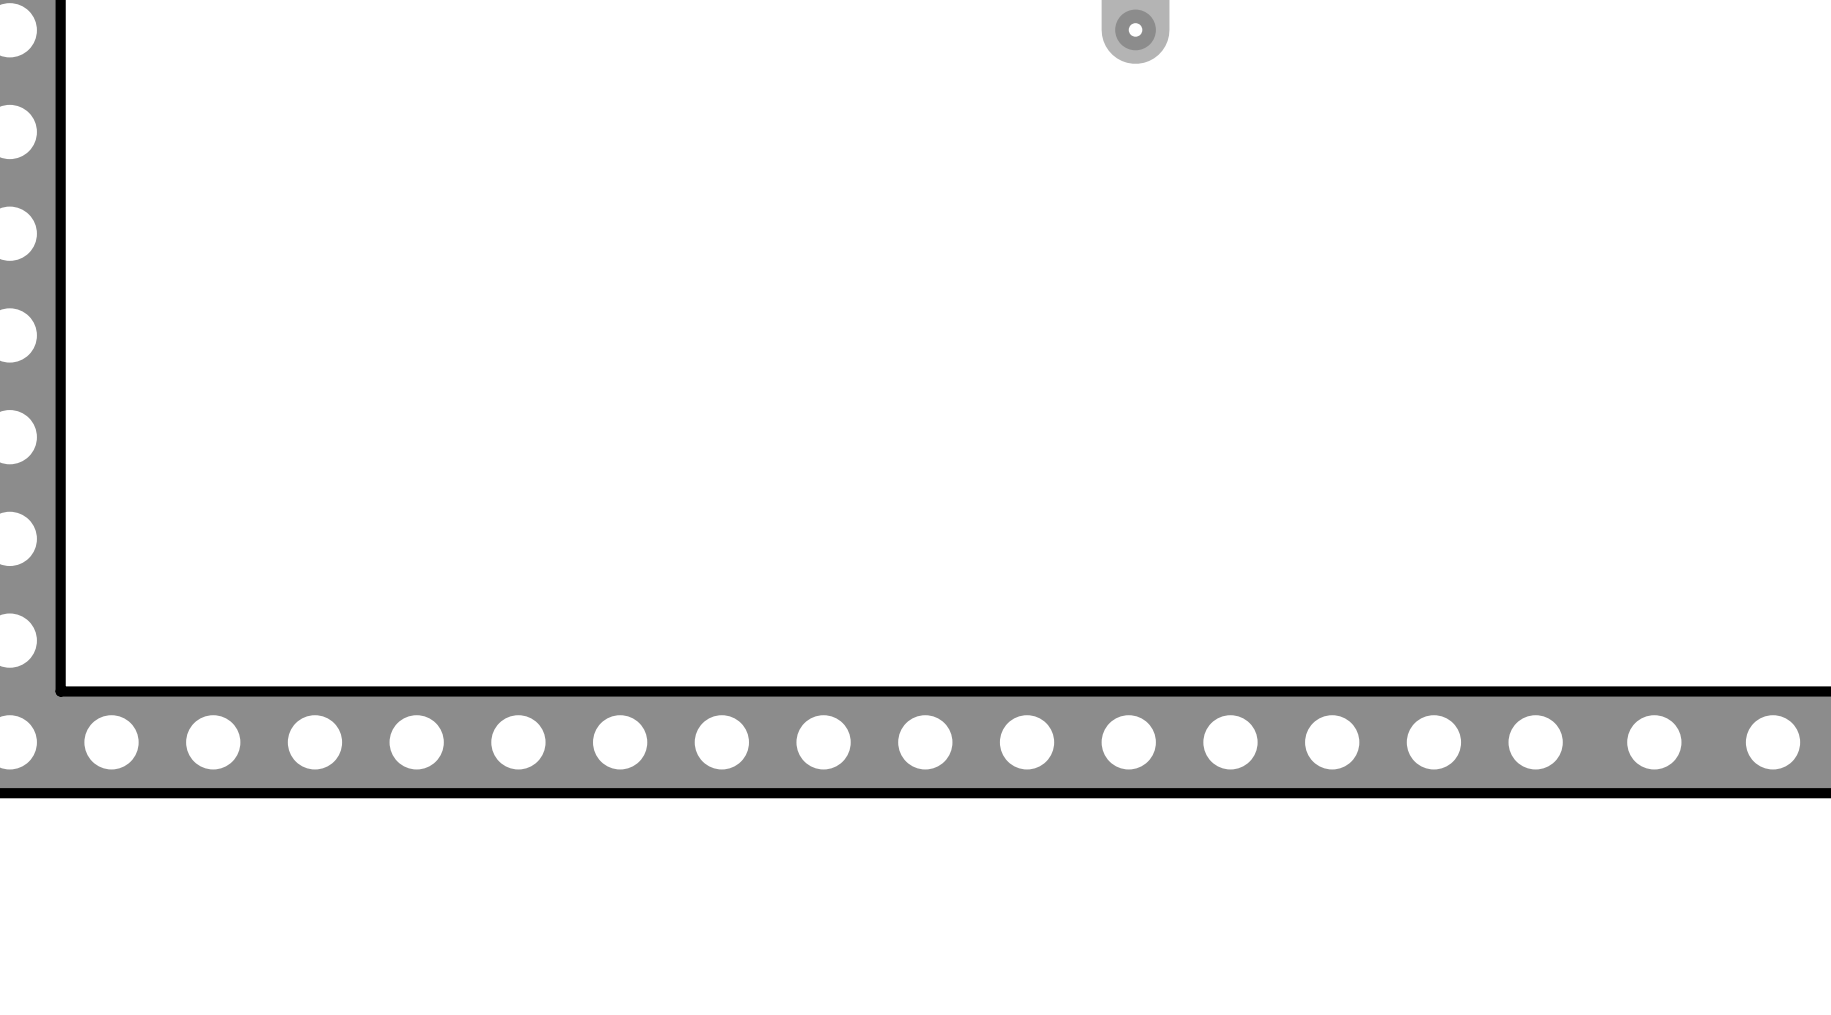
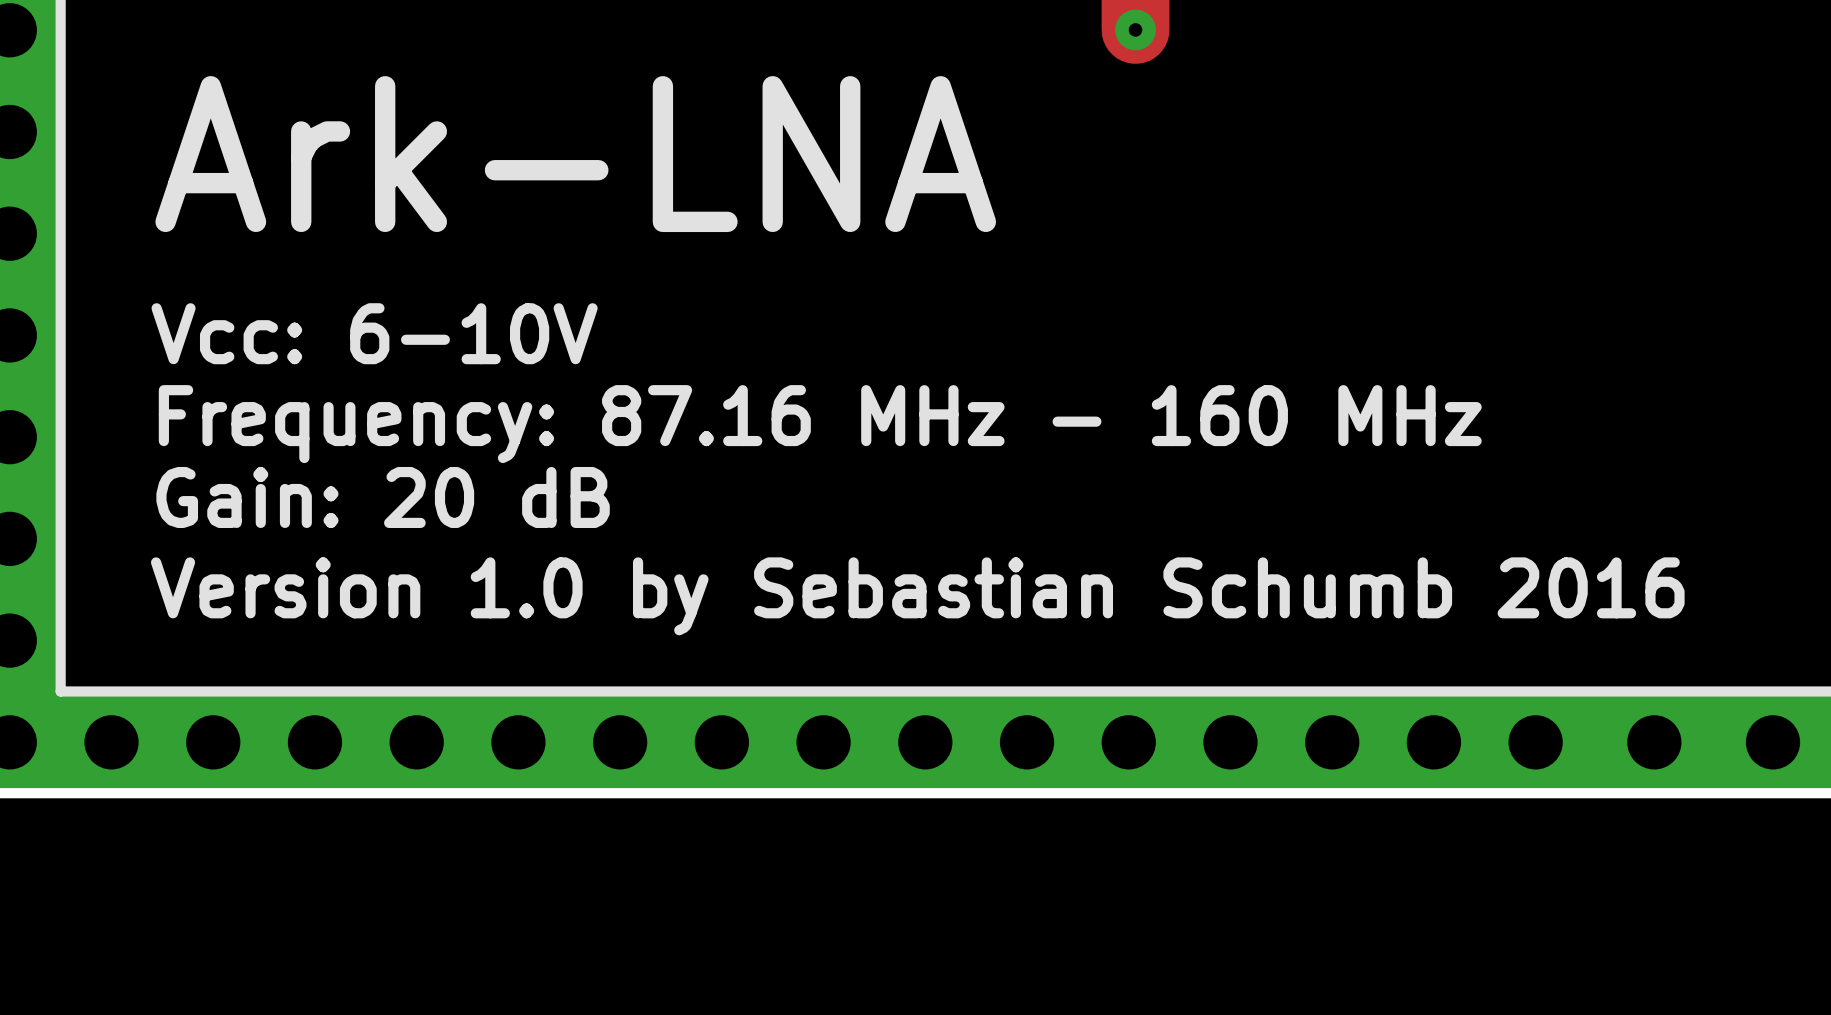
text: none -> Ark-LNA (575, 154)
text: none -> Vcc: 6-10V (374, 333)
text: none -> Frequency: 87.16 MHz - 160 MHz (820, 424)
text: none -> Gain: 20 dB (383, 497)
text: none -> Version 1.0 by Sebastian Schumb 2016 (917, 596)

